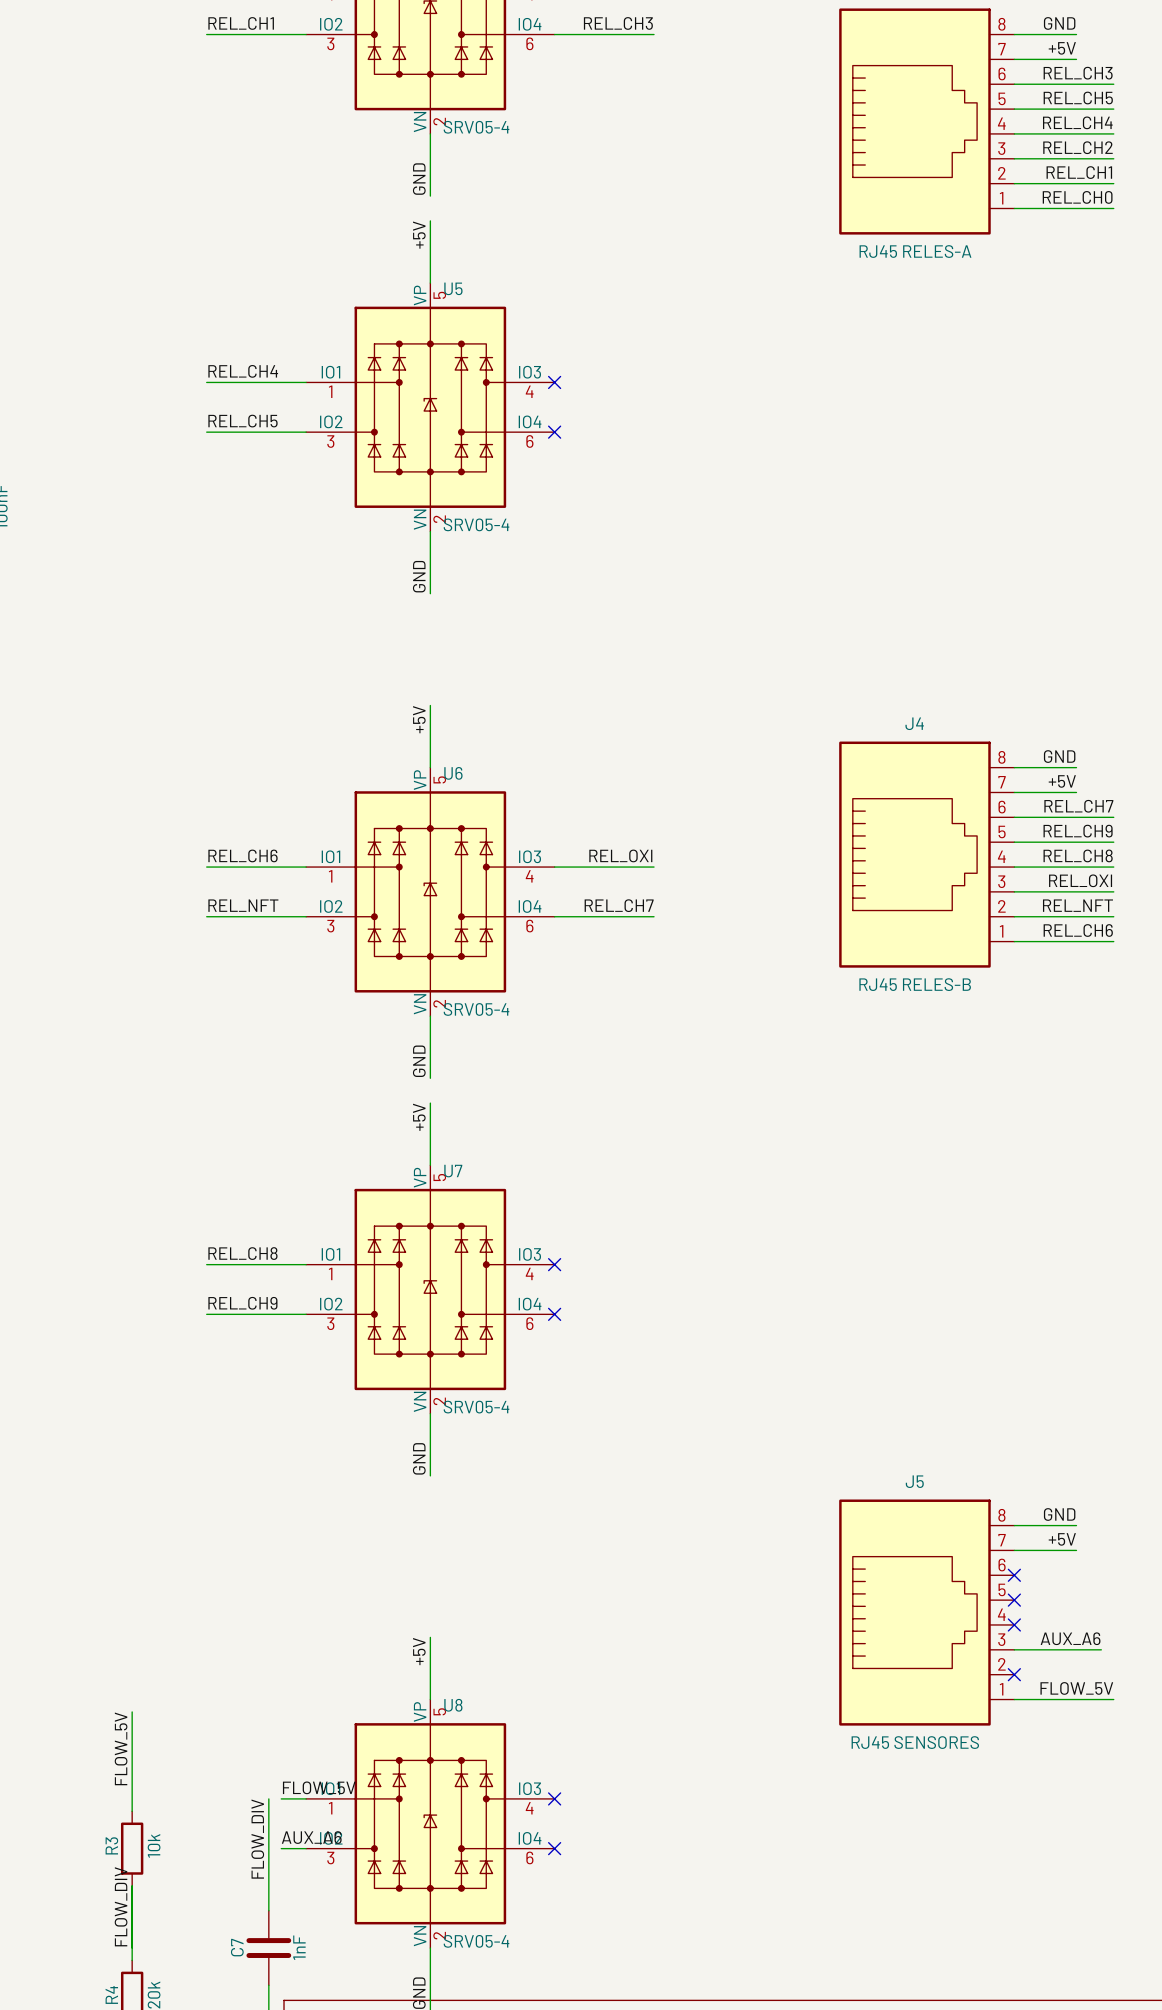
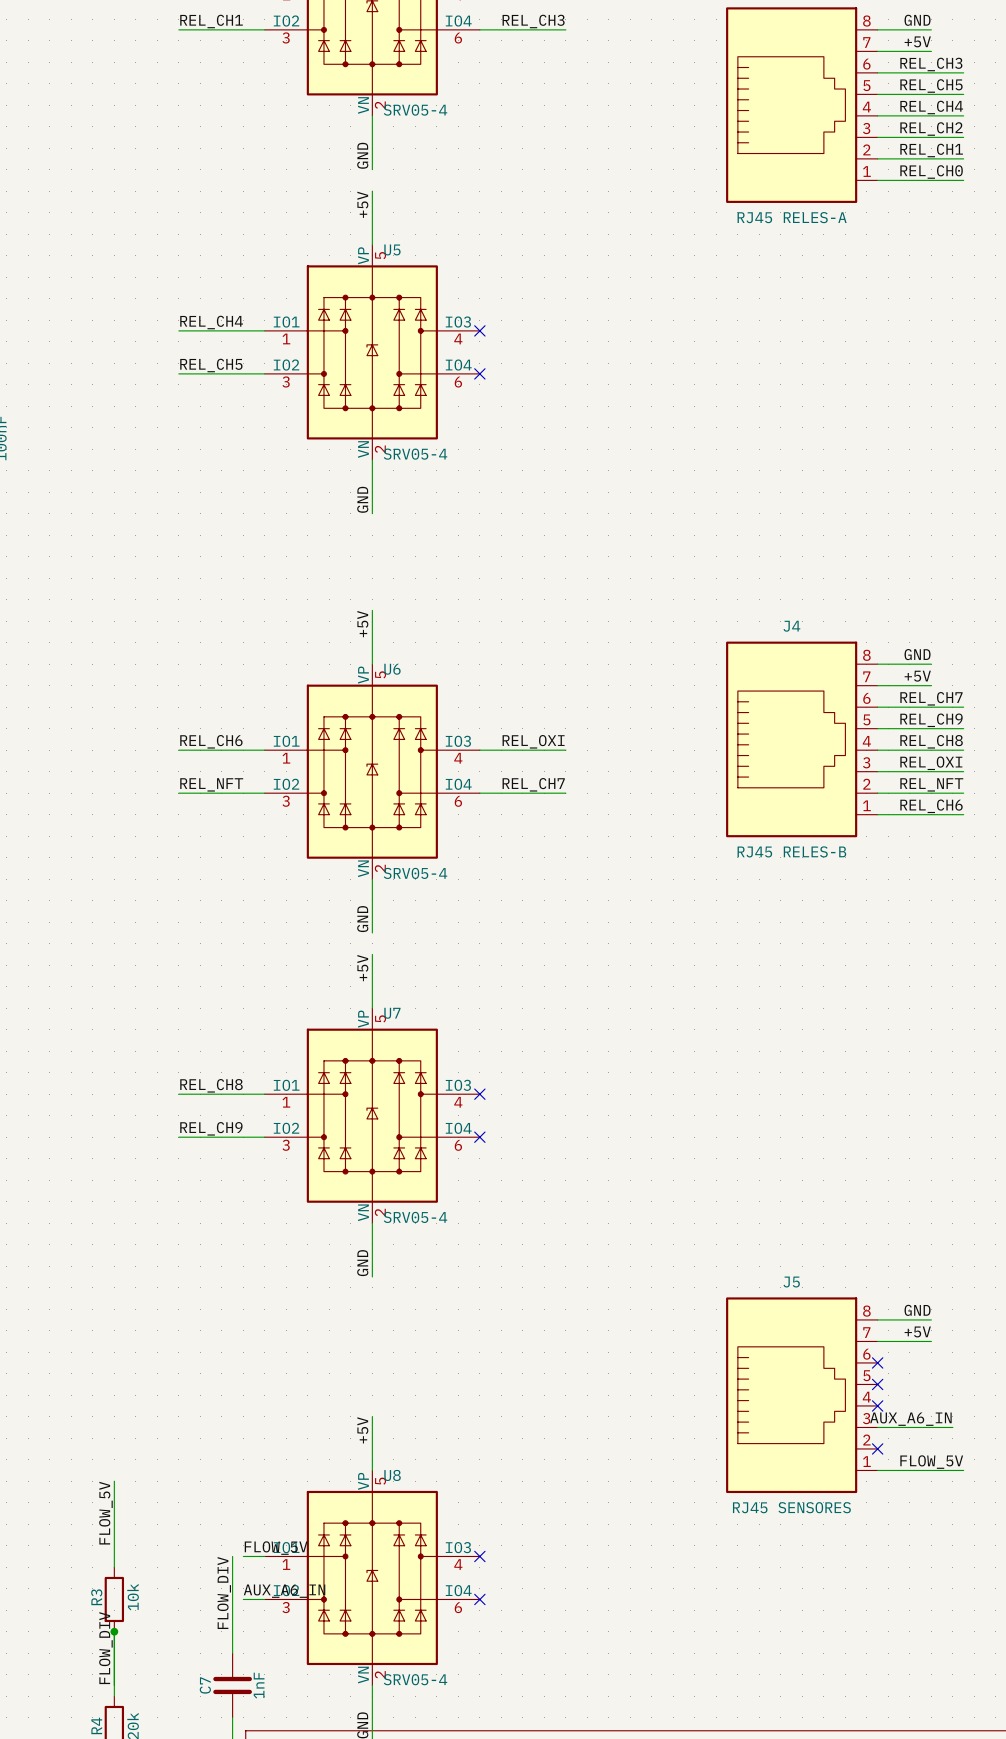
label: AUX_A6 (1070, 1638) -> AUX_A6_IN (910, 1419)
label: AUX_A6 (311, 1837) -> AUX_A6_IN (284, 1591)
junction: none -> (114, 1631)

